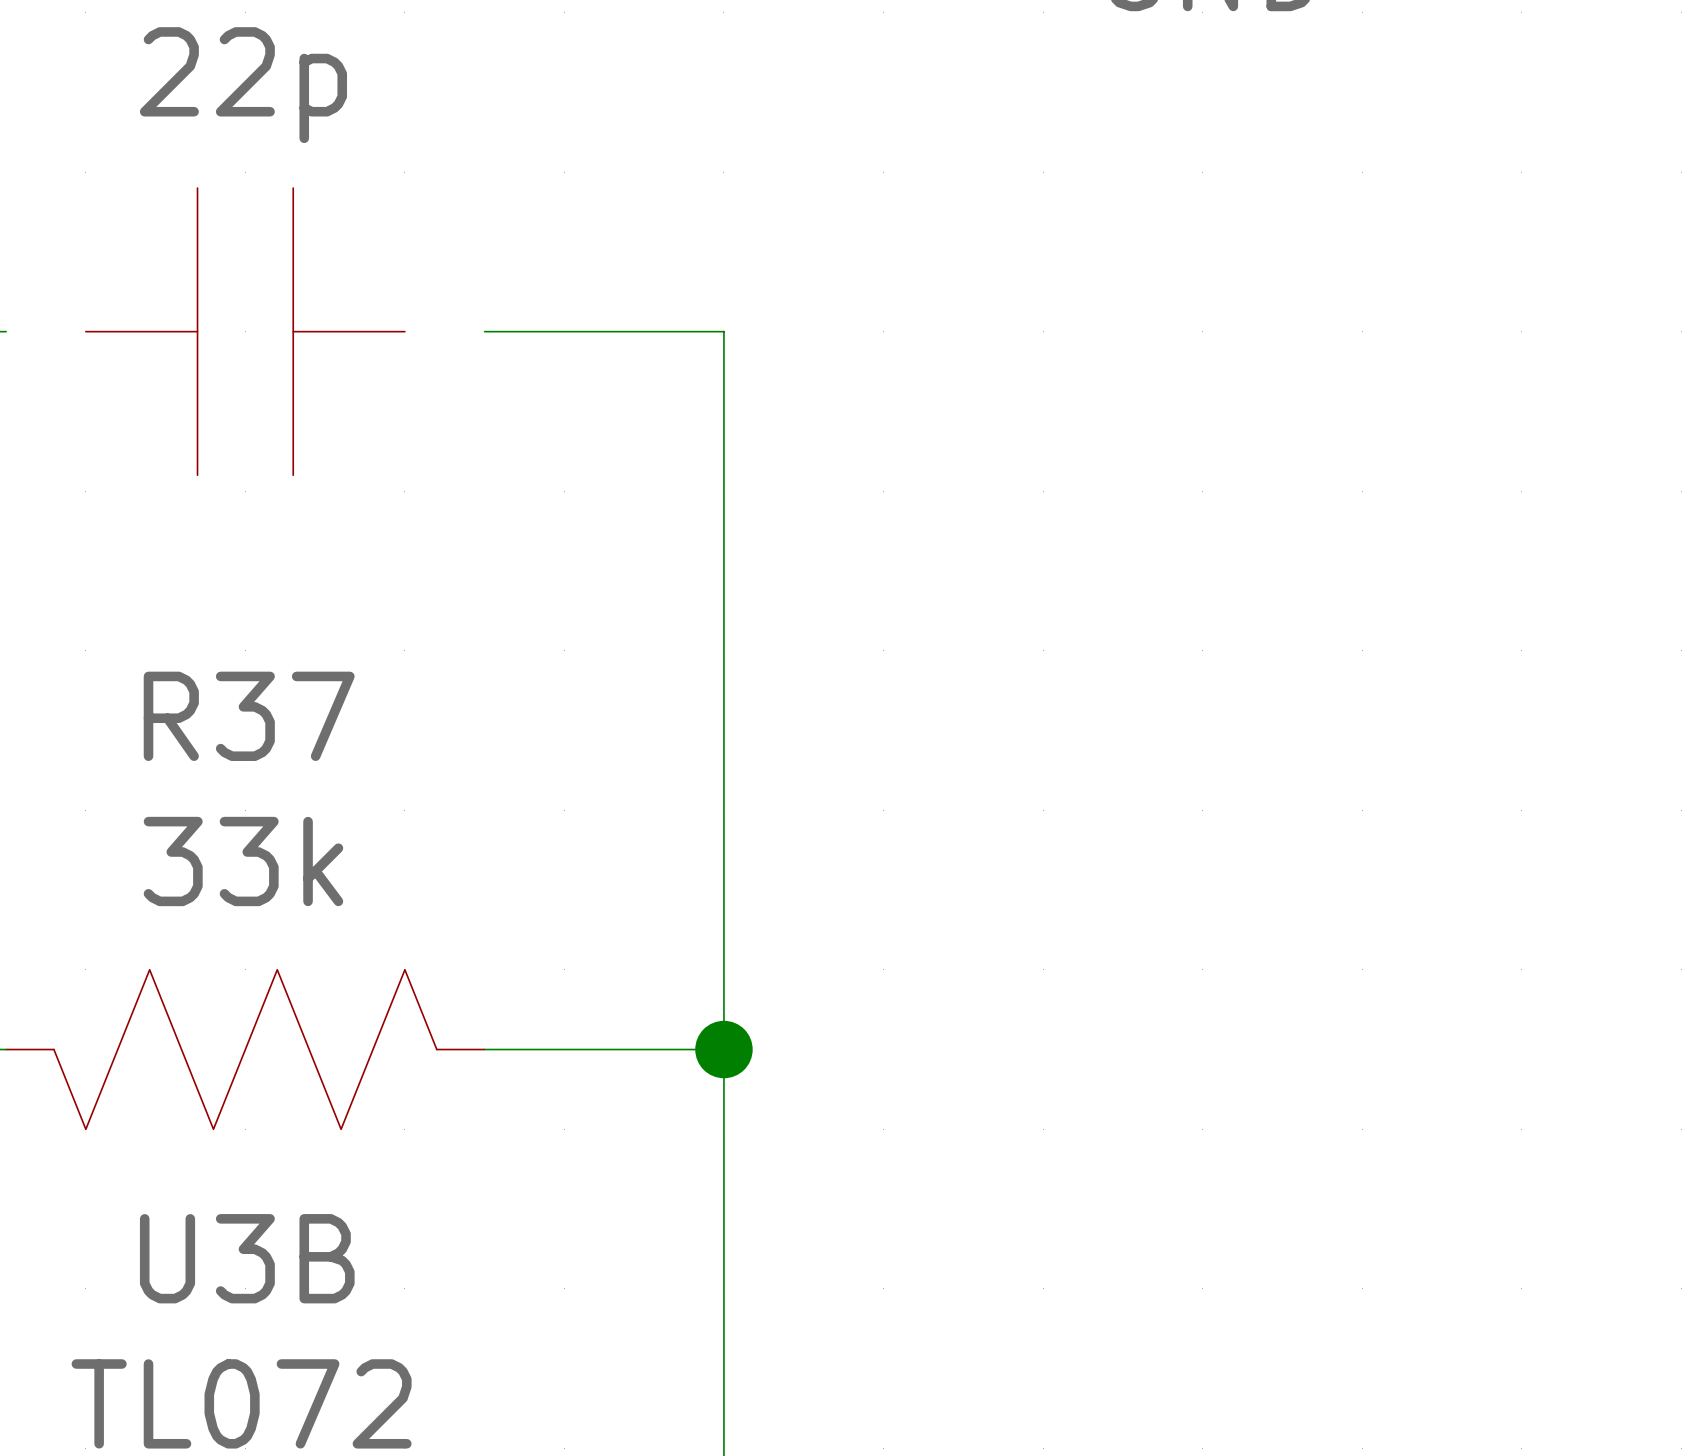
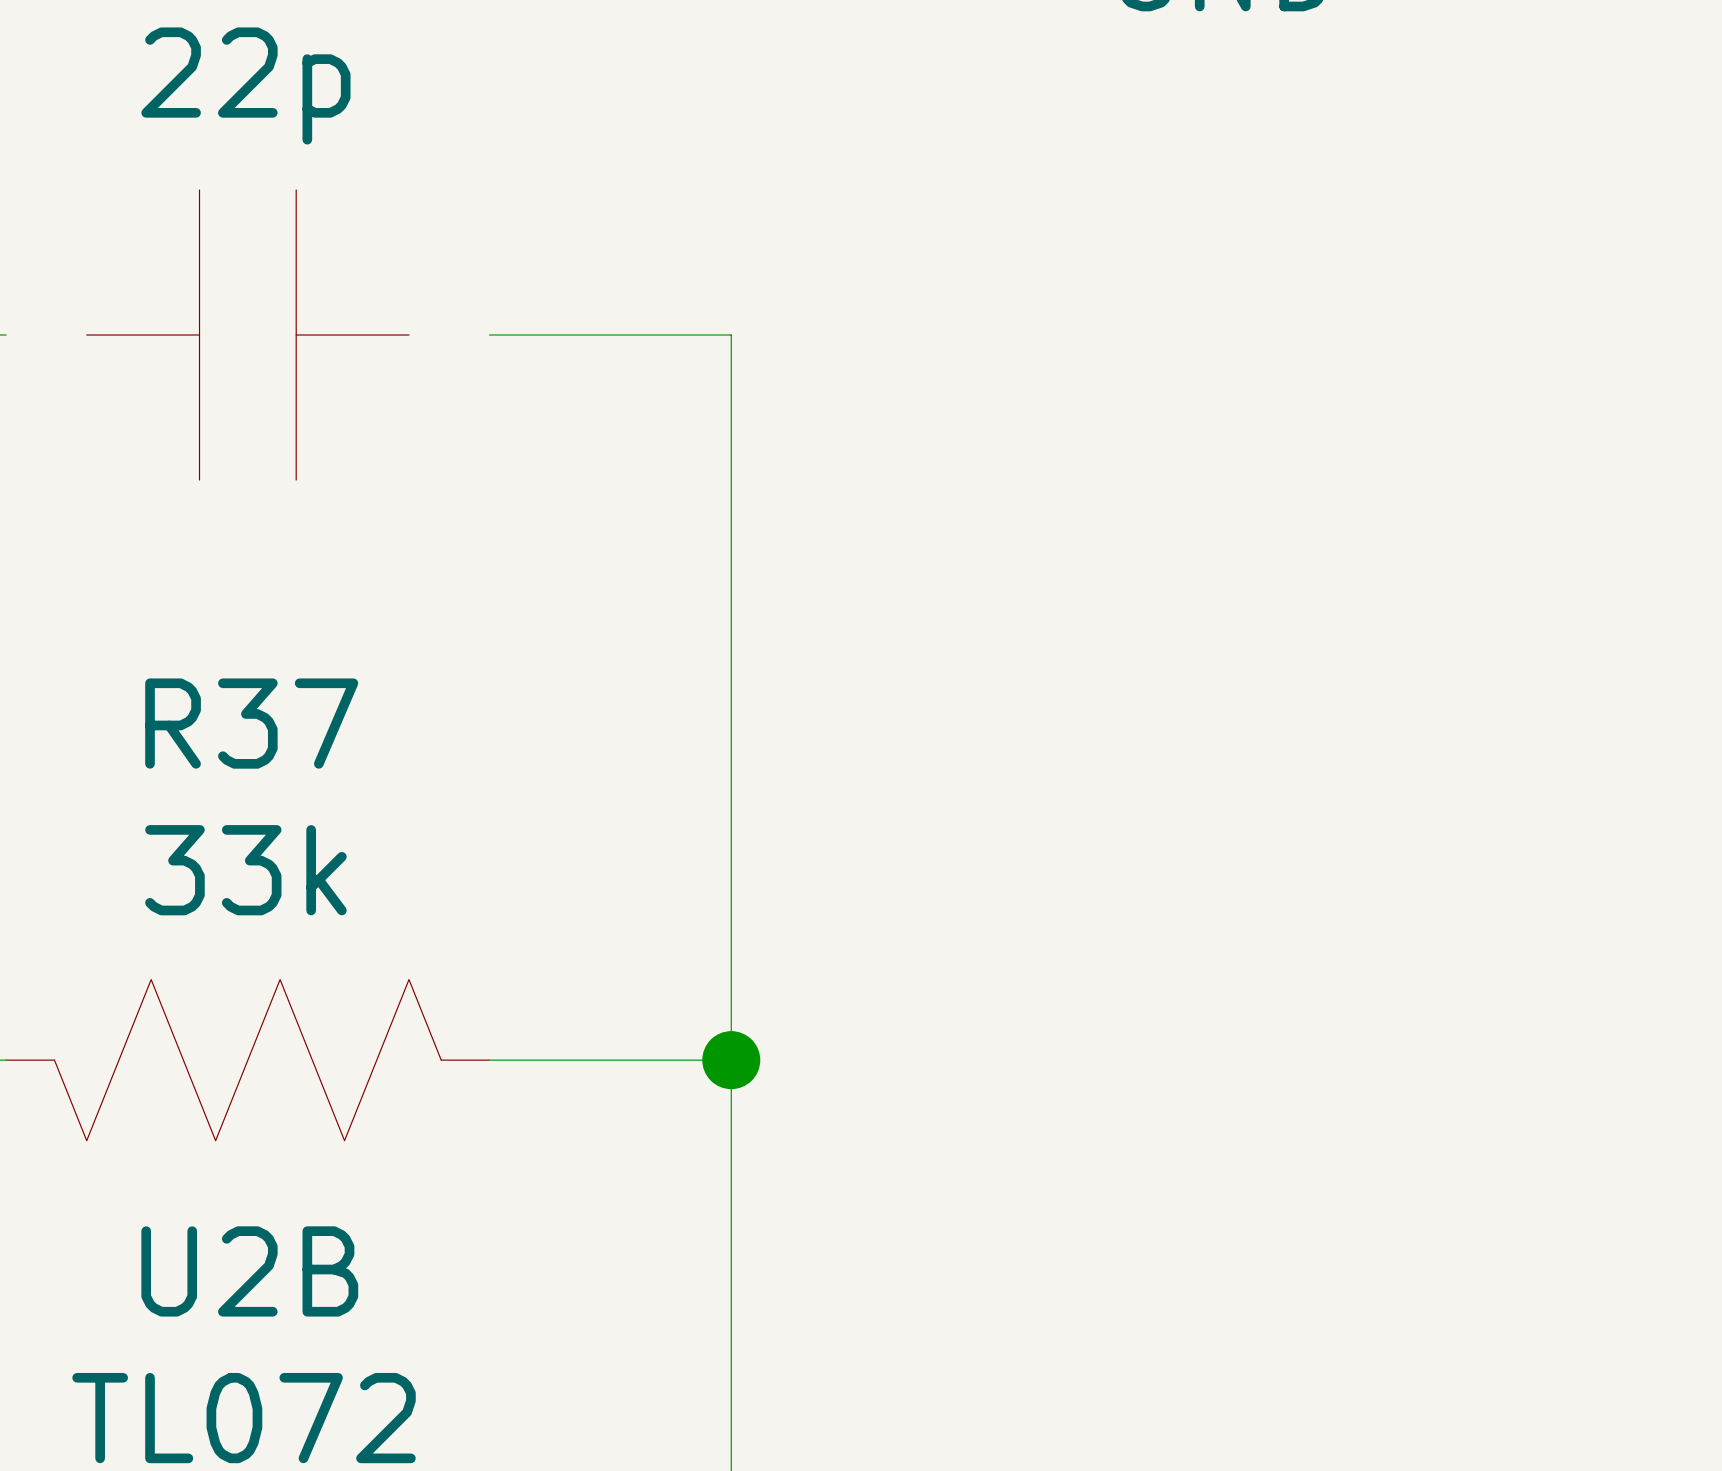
U3B name: U3B (247, 1258) -> U2B (249, 1271)

